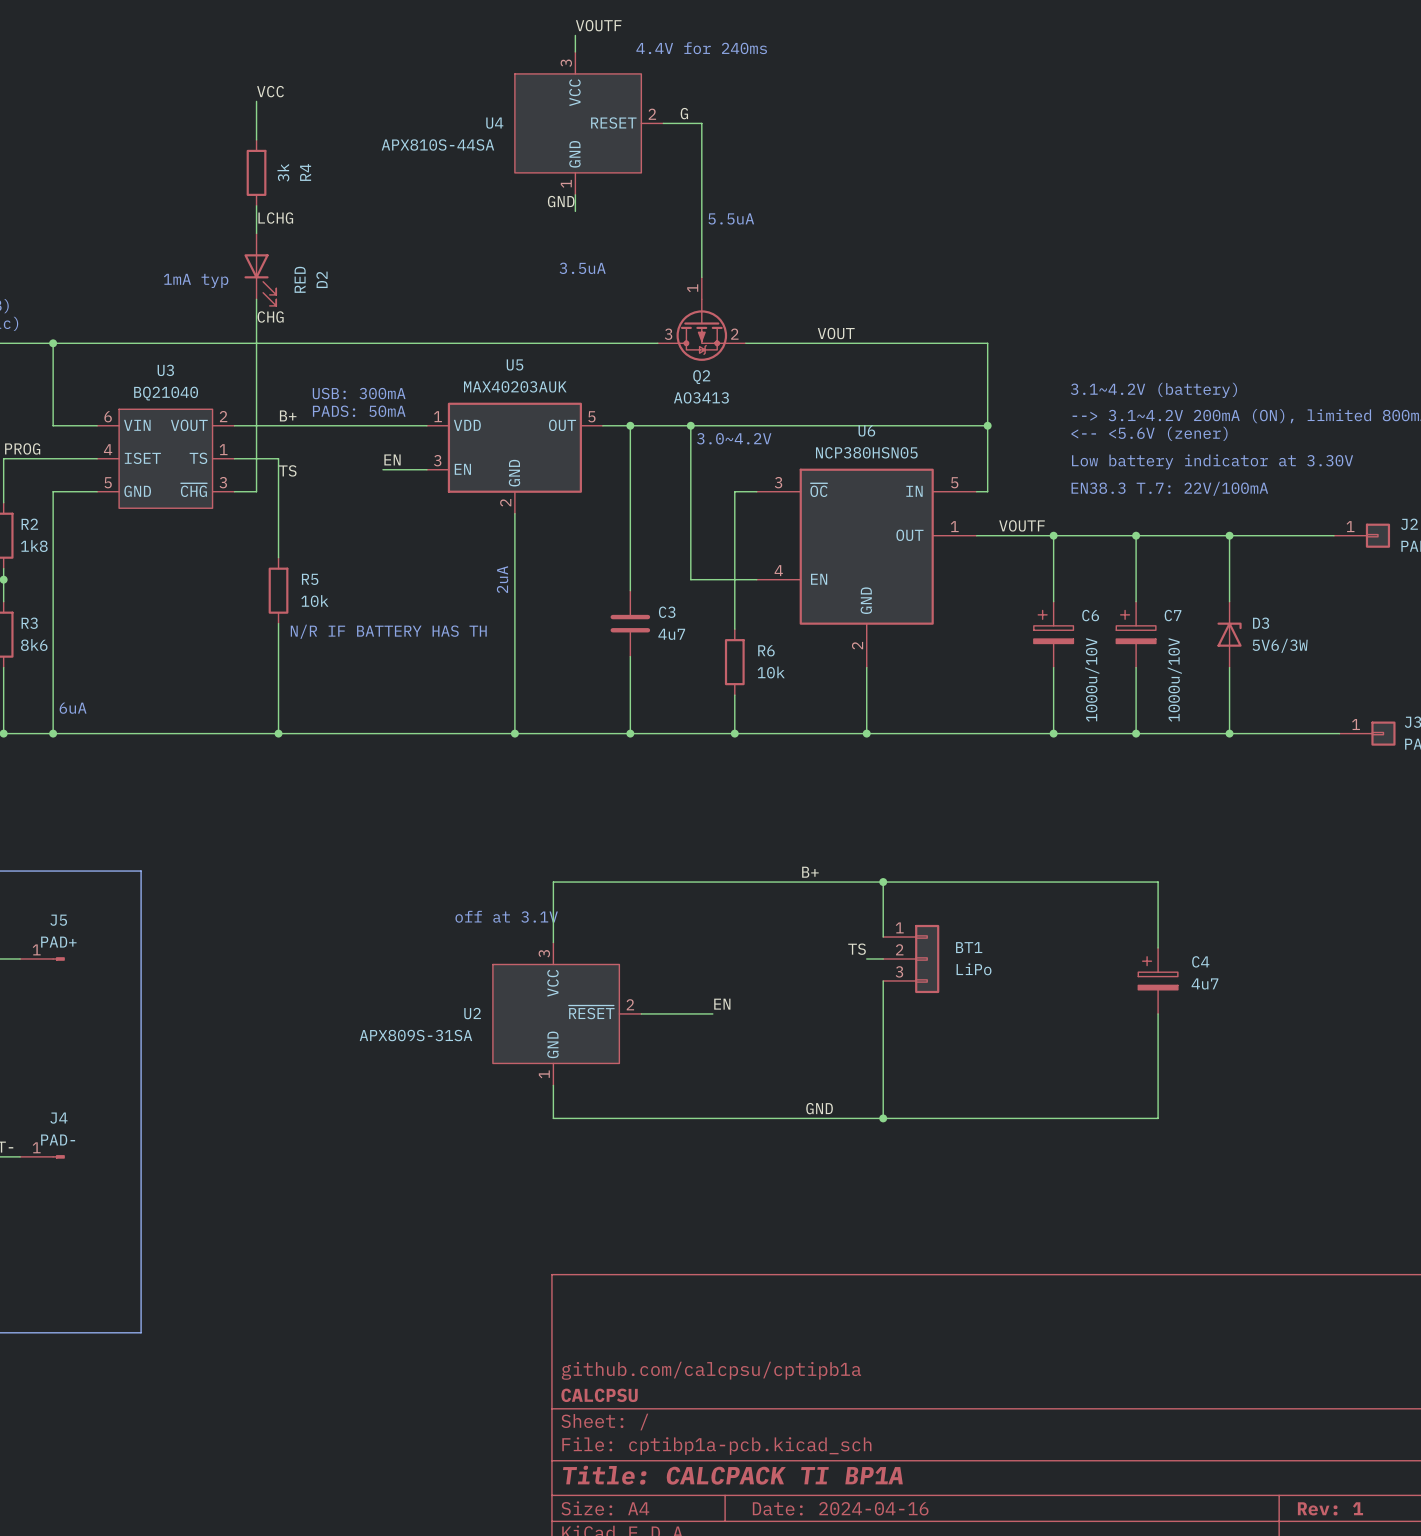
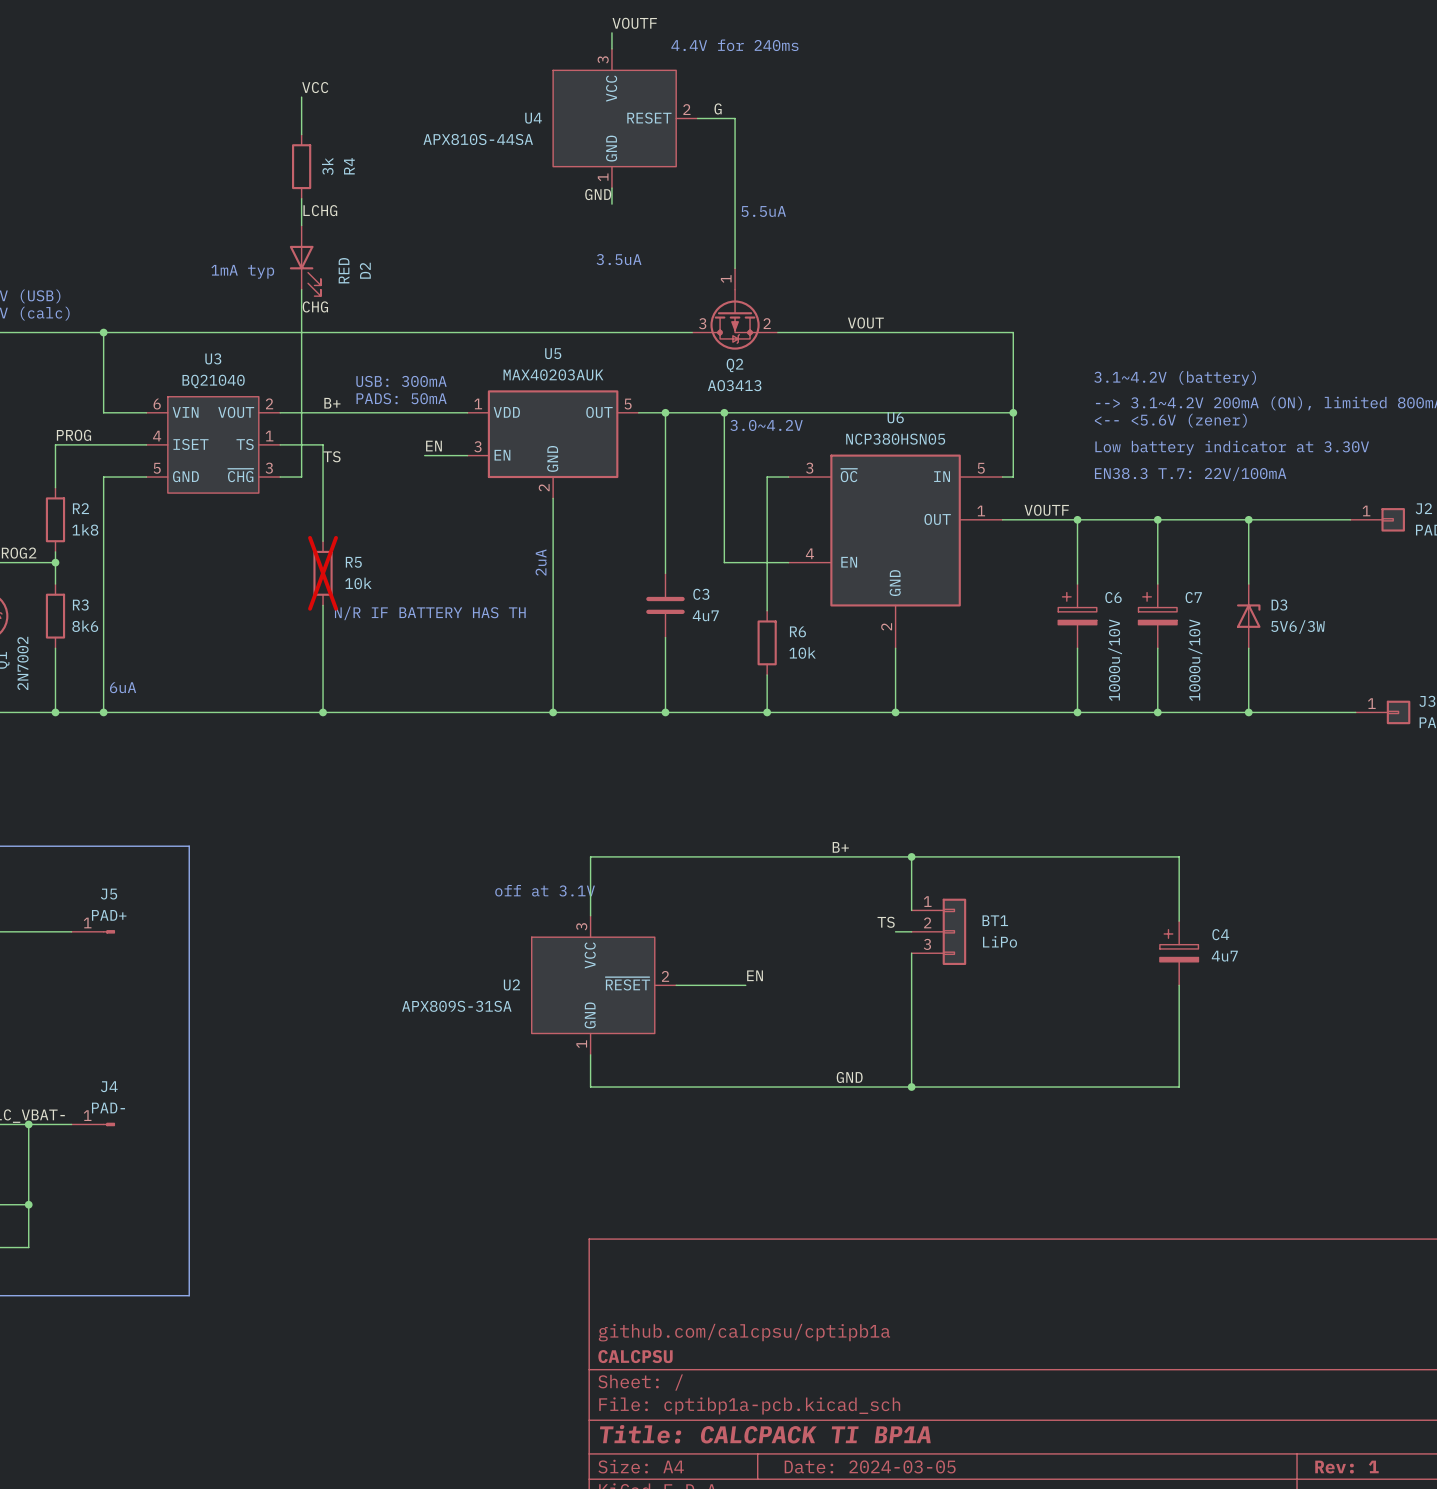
R5 do-not-place cross: none -> (323, 573)
title block: Date: 2024-04-16 (840, 1508) -> Date: 2024-03-05 (870, 1466)

